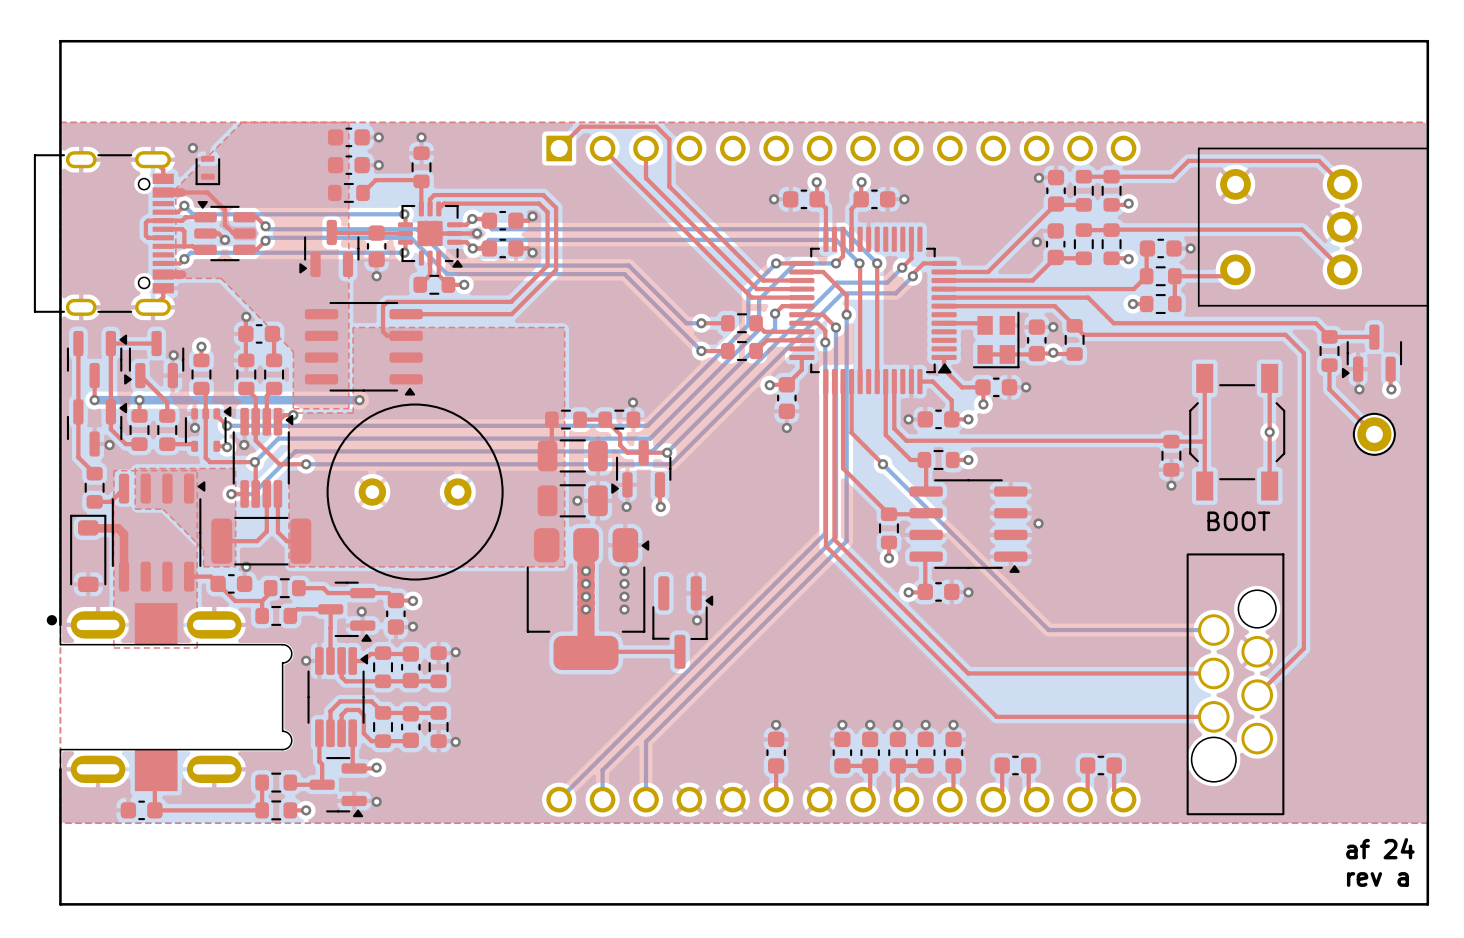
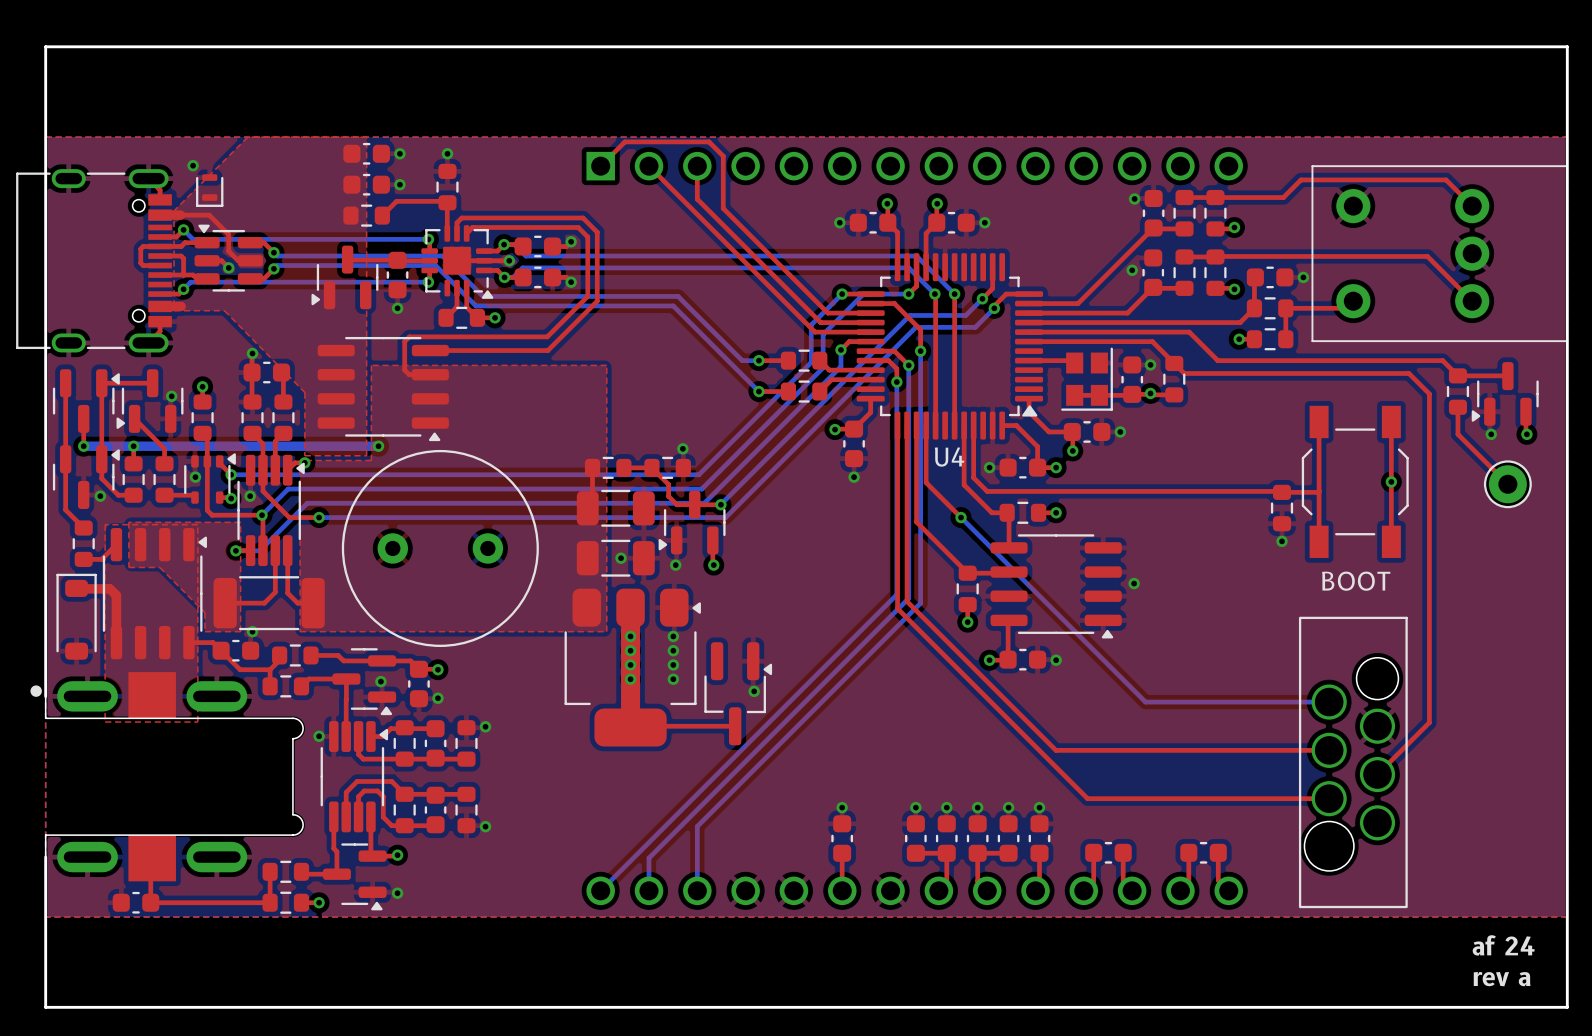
U4 name: none -> U4 (949, 457)

